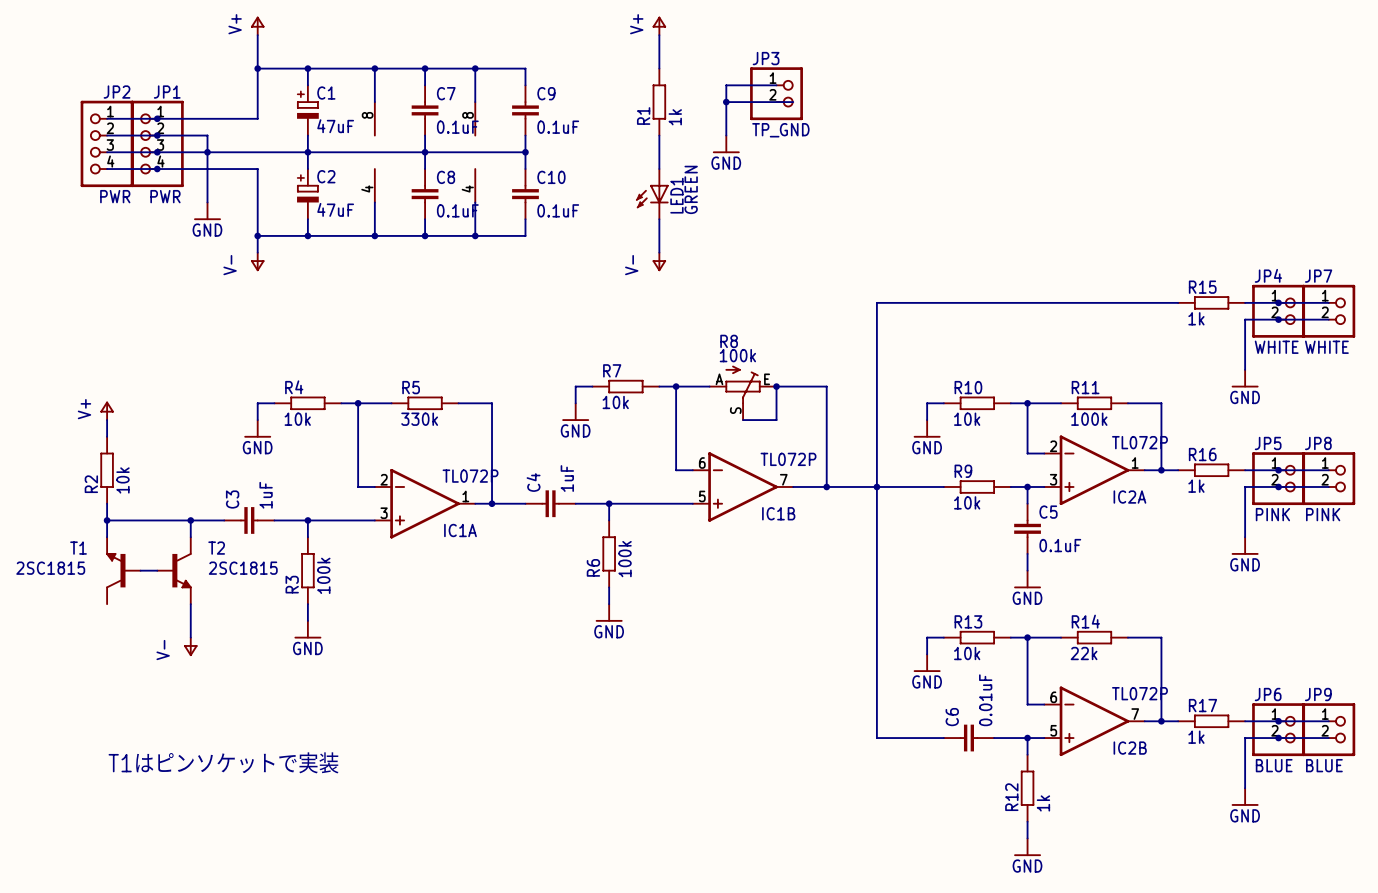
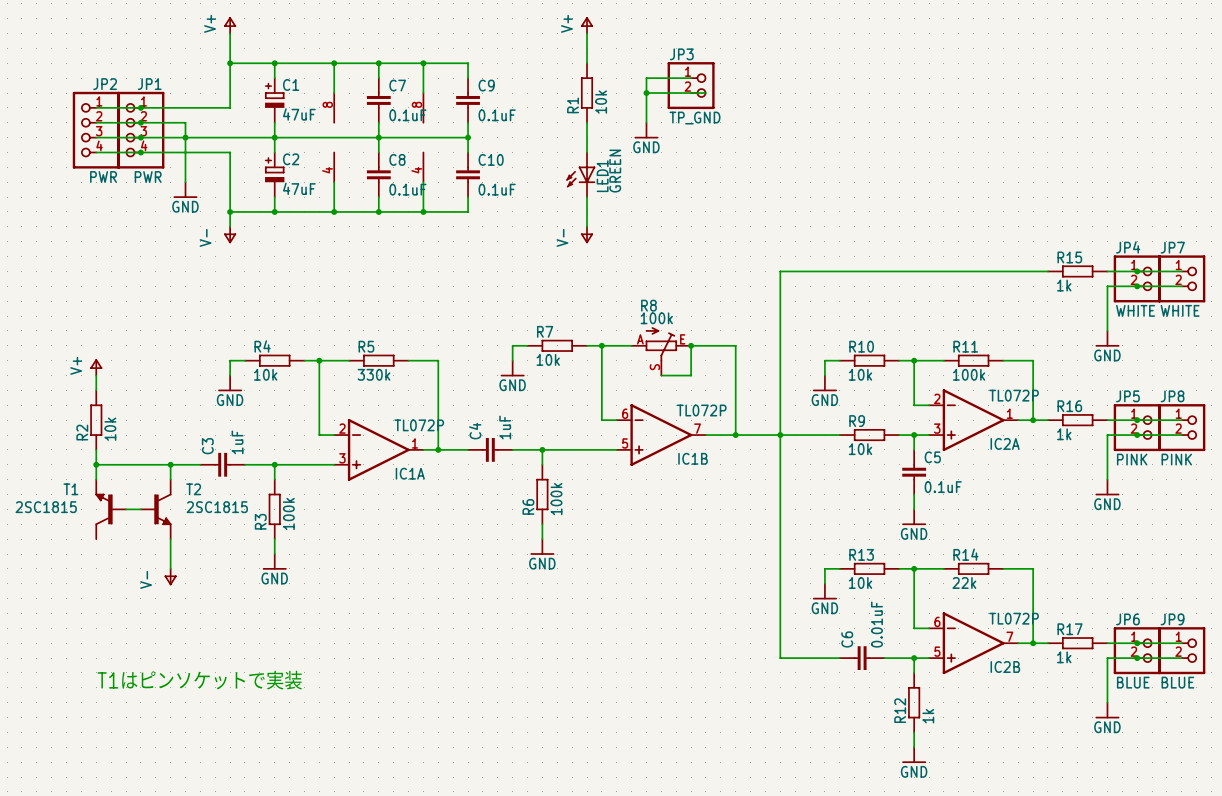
R1 value: 1k (675, 117) -> 10k (601, 102)

